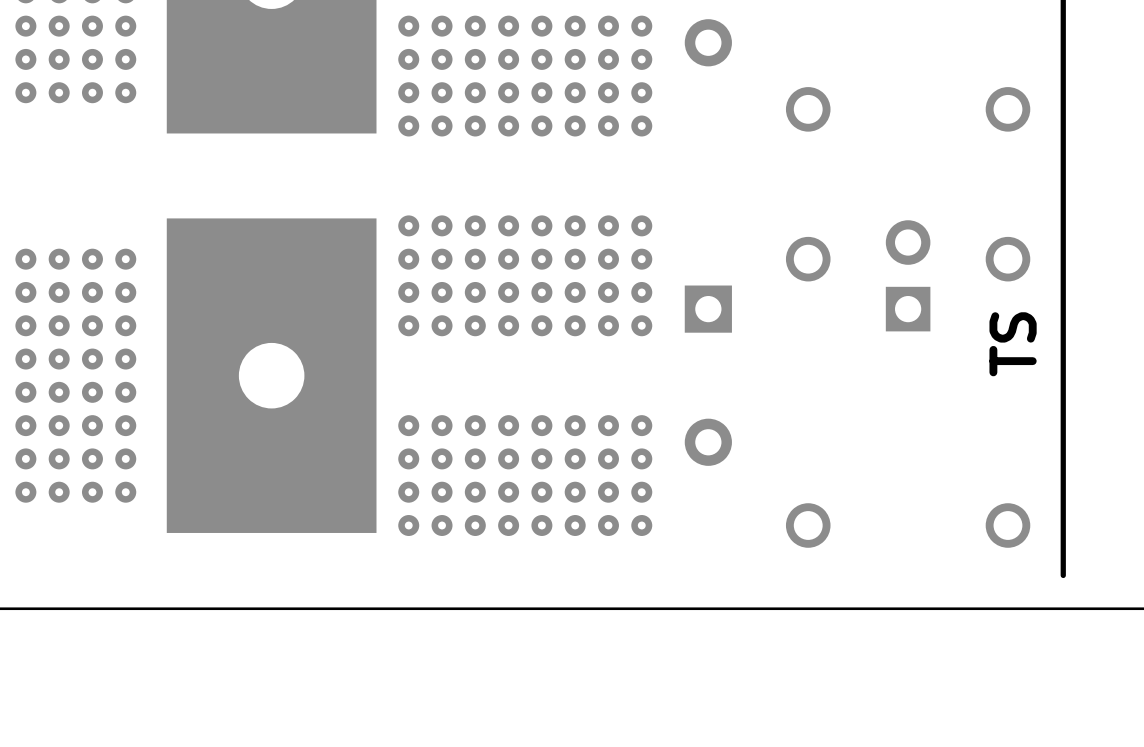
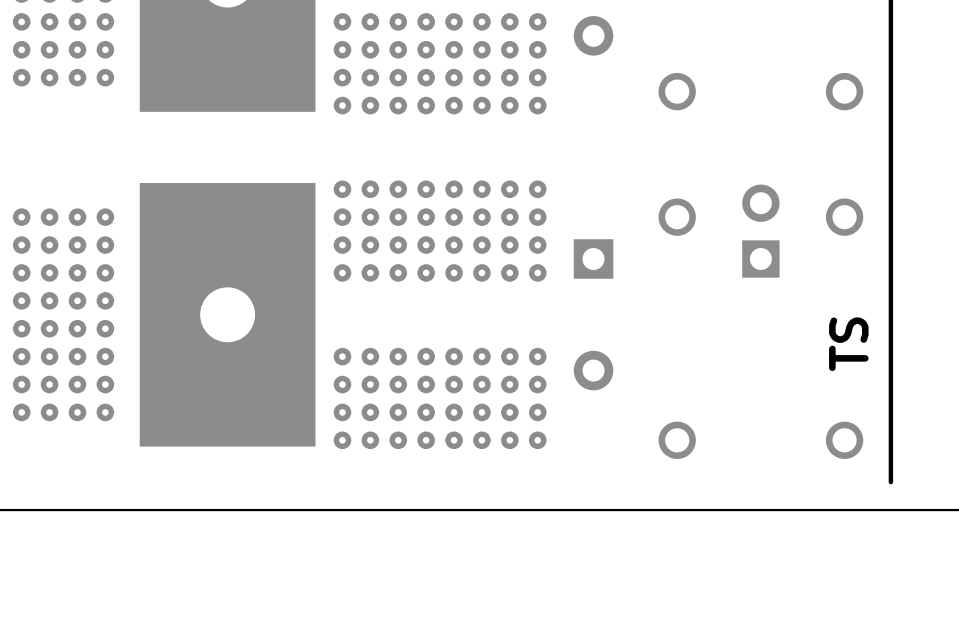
text position: TS (1013, 344) -> TS (848, 344)

